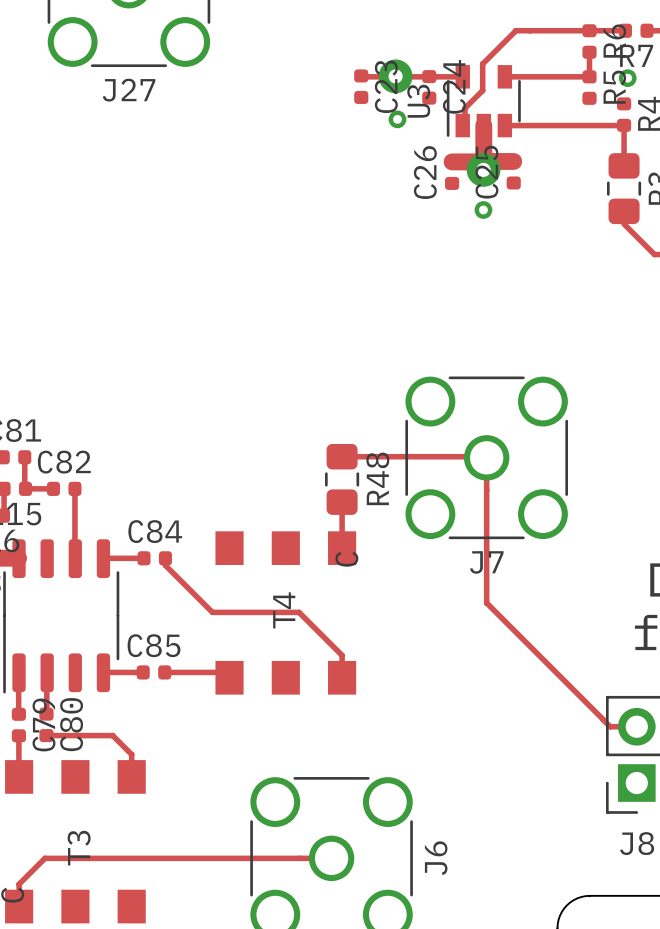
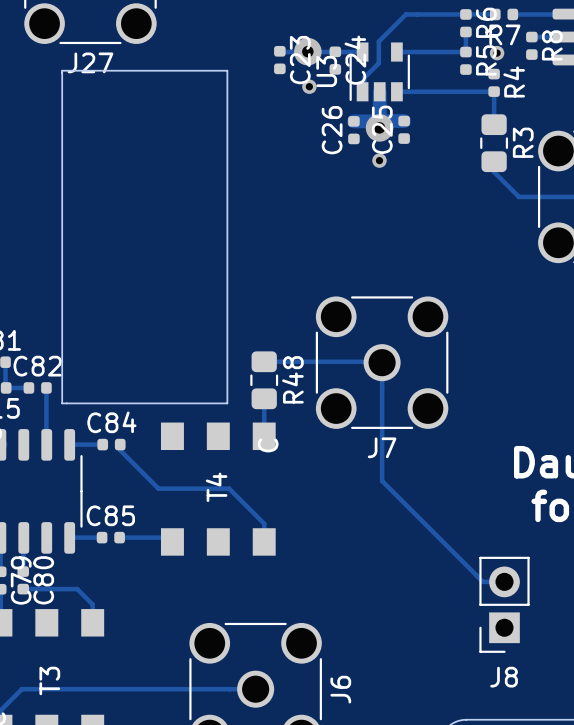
board edge: none -> (62, 70) (62, 403) (227, 403) (227, 70) (62, 70)

